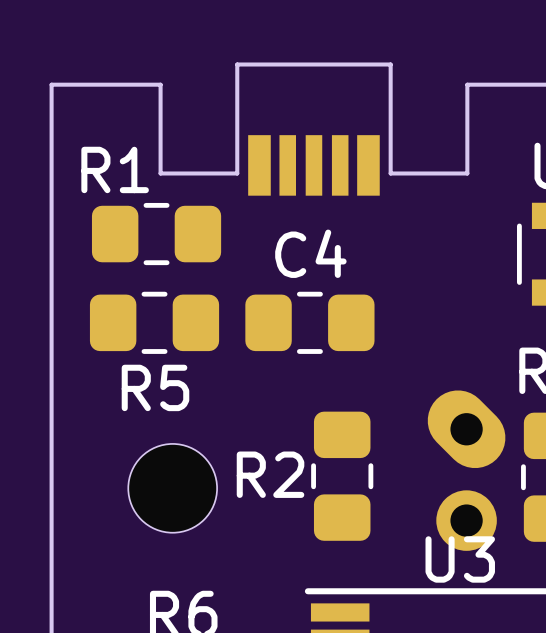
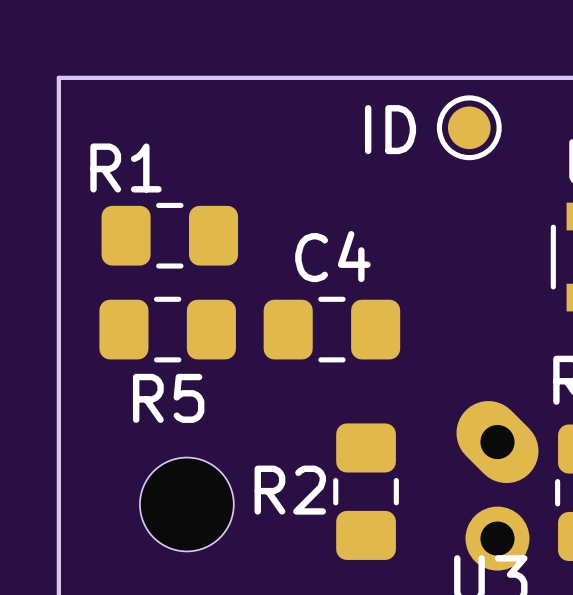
board edge: (467, 84) (467, 173) (390, 173) (390, 64) (237, 64) (237, 173) (160, 173) (160, 84) -> (498, 77) (174, 77)
ID: none -> (469, 127)
part: (313, 165) -> none

